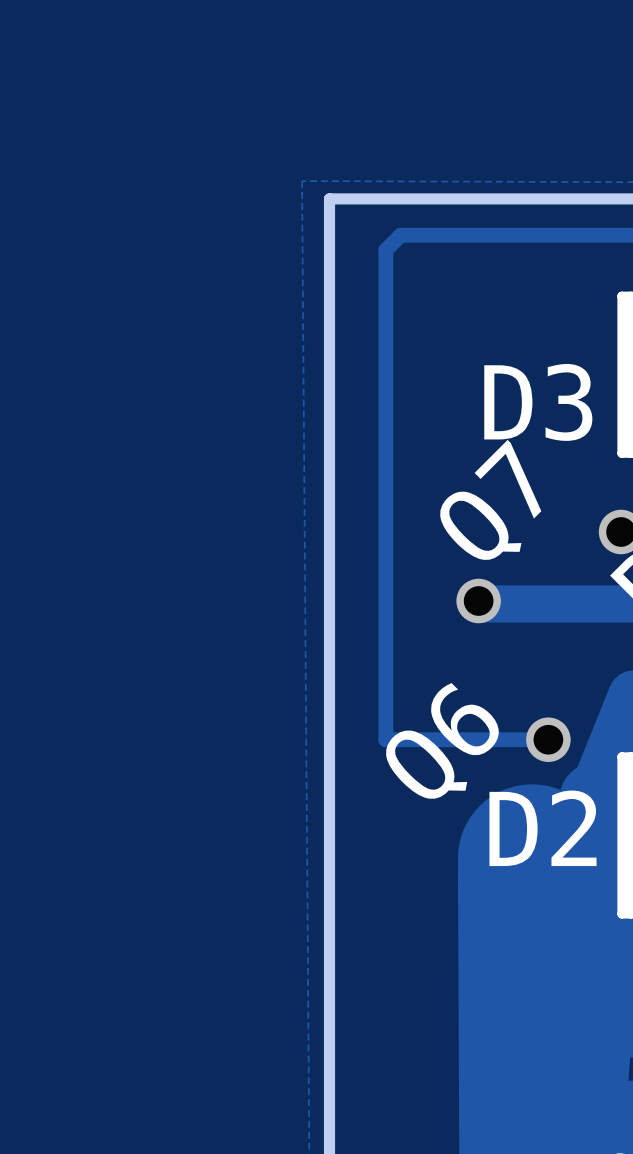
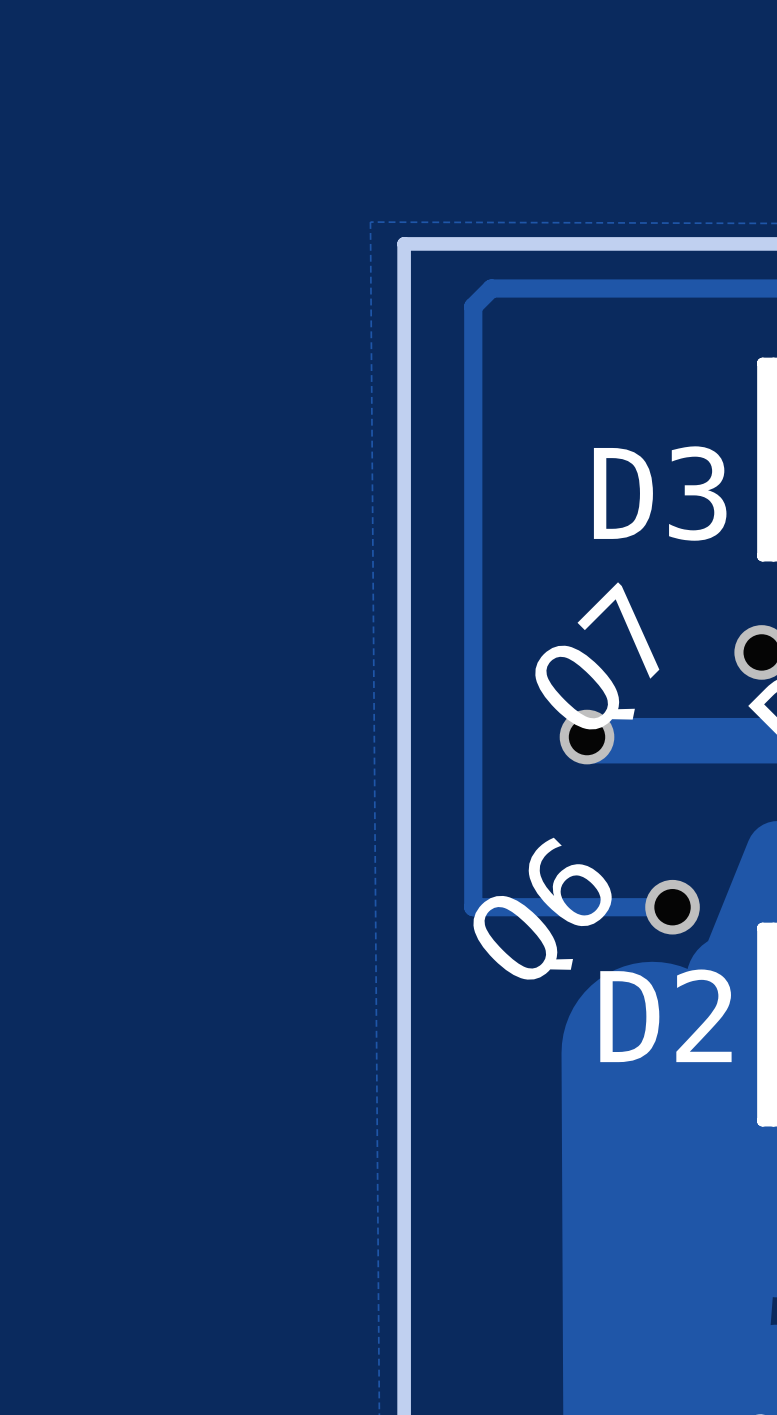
text position: Q7 (489, 500) -> Q7 (596, 657)

